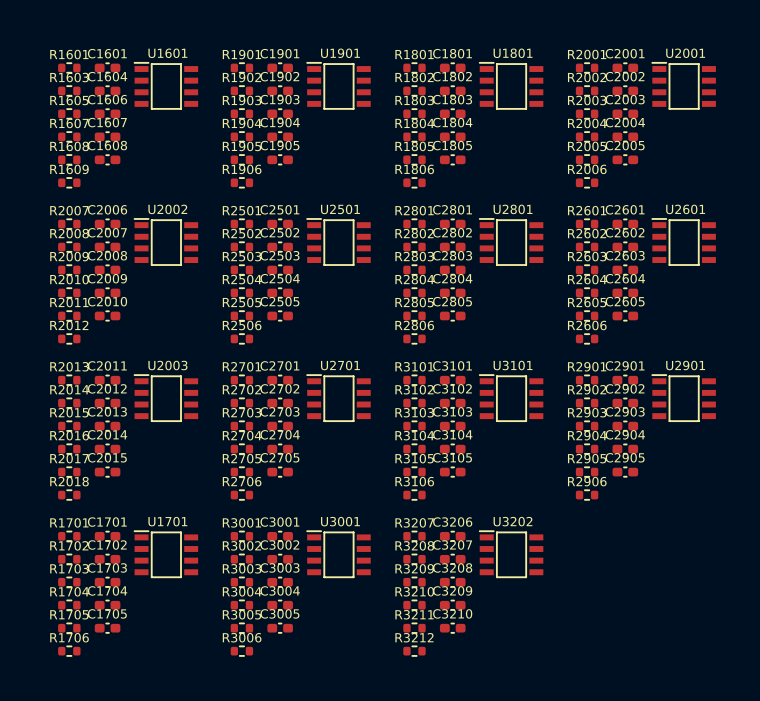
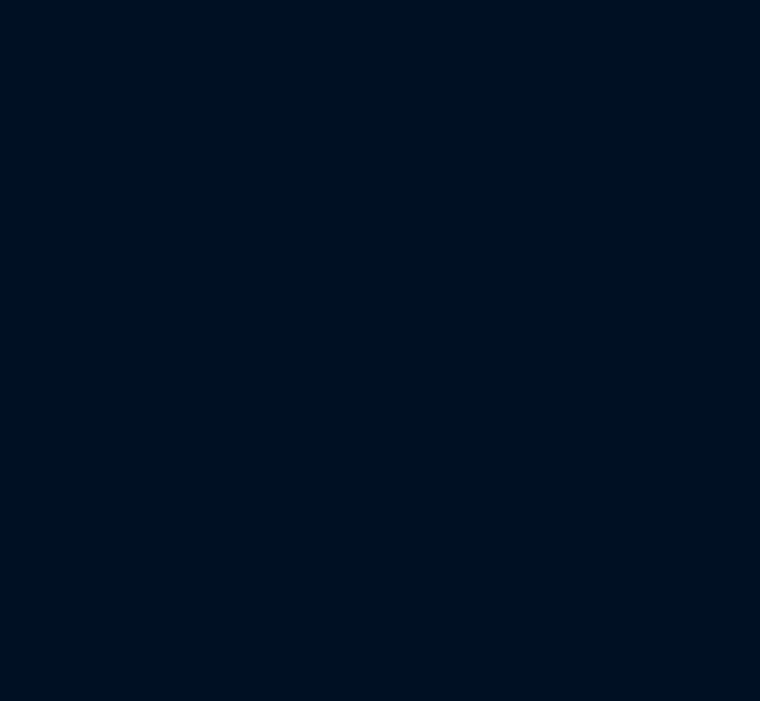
R1601: (69, 67) -> none
C1601: (107, 67) -> none
R1901: (241, 67) -> none
C1901: (280, 67) -> none
R1801: (414, 67) -> none
C1801: (452, 67) -> none
R2001: (587, 67) -> none
C2001: (625, 67) -> none
U1601: (165, 85) -> none
U1901: (338, 85) -> none
U1801: (511, 85) -> none
U2001: (683, 85) -> none
R1603: (69, 90) -> none
C1604: (107, 90) -> none
R1902: (241, 90) -> none
C1902: (280, 90) -> none
R1802: (414, 90) -> none
C1802: (452, 90) -> none
R2002: (587, 90) -> none
C2002: (625, 90) -> none
R1605: (69, 113) -> none
C1606: (107, 113) -> none
R1903: (241, 113) -> none
C1903: (280, 113) -> none
R1803: (414, 113) -> none
C1803: (452, 113) -> none
R2003: (587, 113) -> none
C2003: (625, 113) -> none
R1607: (69, 136) -> none
C1607: (107, 136) -> none
R1904: (241, 136) -> none
C1904: (280, 136) -> none
R1804: (414, 136) -> none
C1804: (452, 136) -> none
R2004: (587, 136) -> none
C2004: (625, 136) -> none
R1608: (69, 159) -> none
C1608: (107, 159) -> none
R1905: (241, 159) -> none
C1905: (280, 159) -> none
R1805: (414, 159) -> none
C1805: (452, 159) -> none
R2005: (587, 159) -> none
C2005: (625, 159) -> none
R1609: (69, 182) -> none
R1906: (241, 182) -> none
R1806: (414, 182) -> none
R2006: (587, 182) -> none
R2007: (69, 224) -> none
C2006: (107, 224) -> none
R2501: (241, 224) -> none
C2501: (280, 224) -> none
R2801: (414, 224) -> none
C2801: (452, 224) -> none
R2601: (587, 224) -> none
C2601: (625, 224) -> none
U2002: (165, 241) -> none
U2501: (338, 241) -> none
U2801: (511, 241) -> none
U2601: (683, 241) -> none
R2008: (69, 247) -> none
C2007: (107, 247) -> none
R2502: (241, 247) -> none
C2502: (280, 247) -> none
R2802: (414, 247) -> none
C2802: (452, 247) -> none
R2602: (587, 247) -> none
C2602: (625, 247) -> none
R2009: (69, 270) -> none
C2008: (107, 270) -> none
R2503: (241, 270) -> none
C2503: (280, 270) -> none
R2803: (414, 270) -> none
C2803: (452, 270) -> none
R2603: (587, 270) -> none
C2603: (625, 270) -> none
R2010: (69, 292) -> none
C2009: (107, 292) -> none
R2504: (241, 292) -> none
C2504: (280, 292) -> none
R2804: (414, 292) -> none
C2804: (452, 292) -> none
R2604: (587, 292) -> none
C2604: (625, 292) -> none
R2011: (69, 315) -> none
C2010: (107, 315) -> none
R2505: (241, 315) -> none
C2505: (280, 315) -> none
R2805: (414, 315) -> none
C2805: (452, 315) -> none
R2605: (587, 315) -> none
C2605: (625, 315) -> none
R2012: (69, 338) -> none
R2506: (241, 338) -> none
R2806: (414, 338) -> none
R2606: (587, 338) -> none
R2013: (69, 380) -> none
C2011: (107, 380) -> none
R2701: (241, 380) -> none
C2701: (280, 380) -> none
R3101: (414, 380) -> none
C3101: (452, 380) -> none
R2901: (587, 380) -> none
C2901: (625, 380) -> none
U2003: (165, 398) -> none
U2701: (338, 398) -> none
U3101: (511, 398) -> none
U2901: (683, 398) -> none
R2014: (69, 403) -> none
C2012: (107, 403) -> none
R2702: (241, 403) -> none
C2702: (280, 403) -> none
R3102: (414, 403) -> none
C3102: (452, 403) -> none
R2902: (587, 403) -> none
C2902: (625, 403) -> none
R2015: (69, 426) -> none
C2013: (107, 426) -> none
R2703: (241, 426) -> none
C2703: (280, 426) -> none
R3103: (414, 426) -> none
C3103: (452, 426) -> none
R2903: (587, 426) -> none
C2903: (625, 426) -> none
R2016: (69, 449) -> none
C2014: (107, 449) -> none
R2704: (241, 449) -> none
C2704: (280, 449) -> none
R3104: (414, 449) -> none
C3104: (452, 449) -> none
R2904: (587, 449) -> none
C2904: (625, 449) -> none
R2017: (69, 472) -> none
C2015: (107, 472) -> none
R2705: (241, 472) -> none
C2705: (280, 472) -> none
R3105: (414, 472) -> none
C3105: (452, 472) -> none
R2905: (587, 472) -> none
C2905: (625, 472) -> none
R2018: (69, 495) -> none
R2706: (241, 495) -> none
R3106: (414, 495) -> none
R2906: (587, 495) -> none
R1701: (69, 536) -> none
C1701: (107, 536) -> none
R3001: (241, 536) -> none
C3001: (280, 536) -> none
R3207: (414, 536) -> none
C3206: (452, 536) -> none
U1701: (165, 554) -> none
U3001: (338, 554) -> none
U3202: (511, 554) -> none
R1702: (69, 559) -> none
C1702: (107, 559) -> none
R3002: (241, 559) -> none
C3002: (280, 559) -> none
R3208: (414, 559) -> none
C3207: (452, 559) -> none
R1703: (69, 582) -> none
C1703: (107, 582) -> none
R3003: (241, 582) -> none
C3003: (280, 582) -> none
R3209: (414, 582) -> none
C3208: (452, 582) -> none
R1704: (69, 605) -> none
C1704: (107, 605) -> none
R3004: (241, 605) -> none
C3004: (280, 605) -> none
R3210: (414, 605) -> none
C3209: (452, 605) -> none
R1705: (69, 628) -> none
C1705: (107, 628) -> none
R3005: (241, 628) -> none
C3005: (280, 628) -> none
R3211: (414, 628) -> none
C3210: (452, 628) -> none
R1706: (69, 651) -> none
R3006: (241, 651) -> none
R3212: (414, 651) -> none

